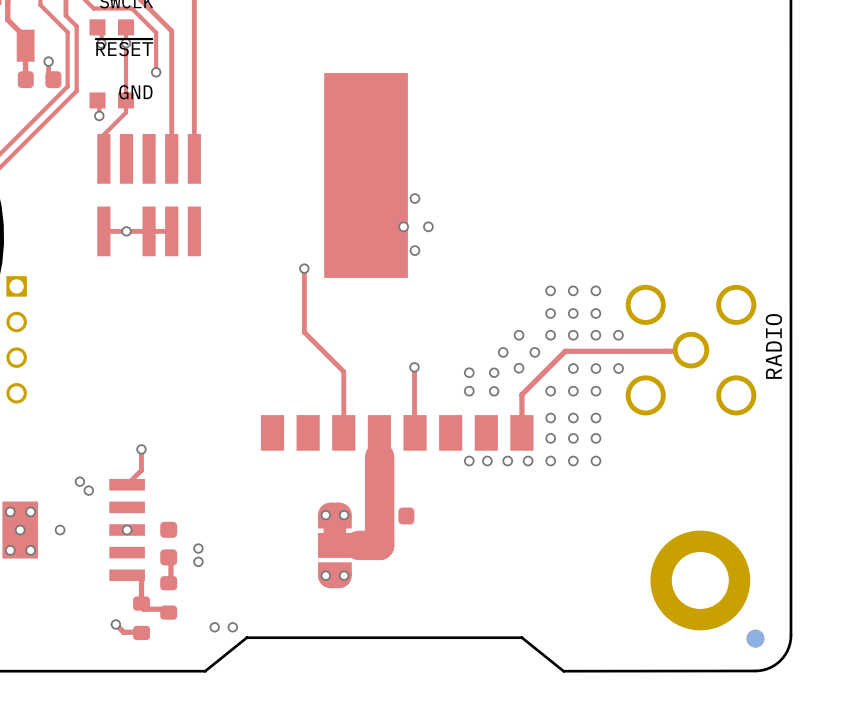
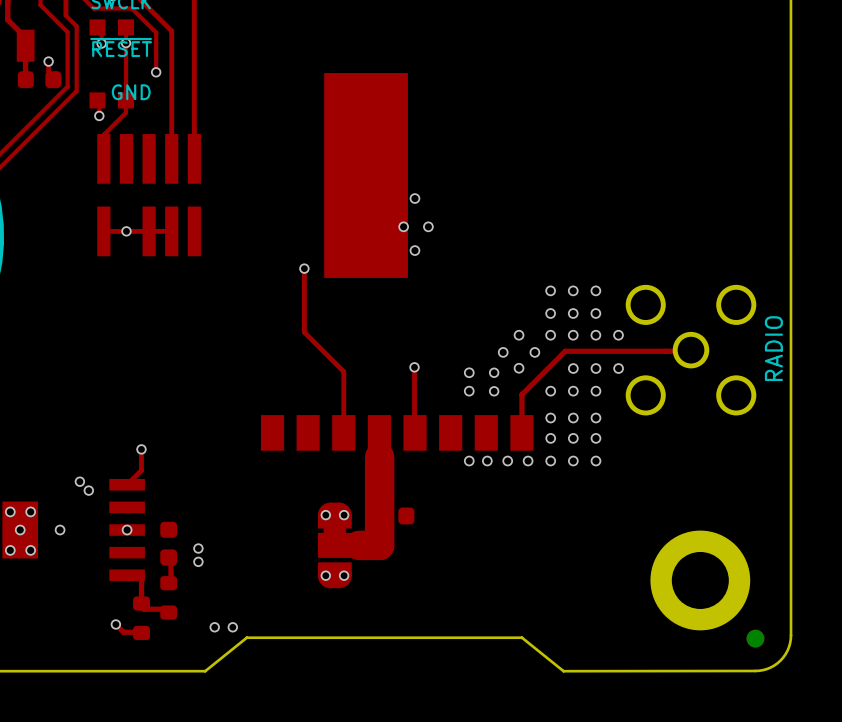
part: (16, 339) -> none

